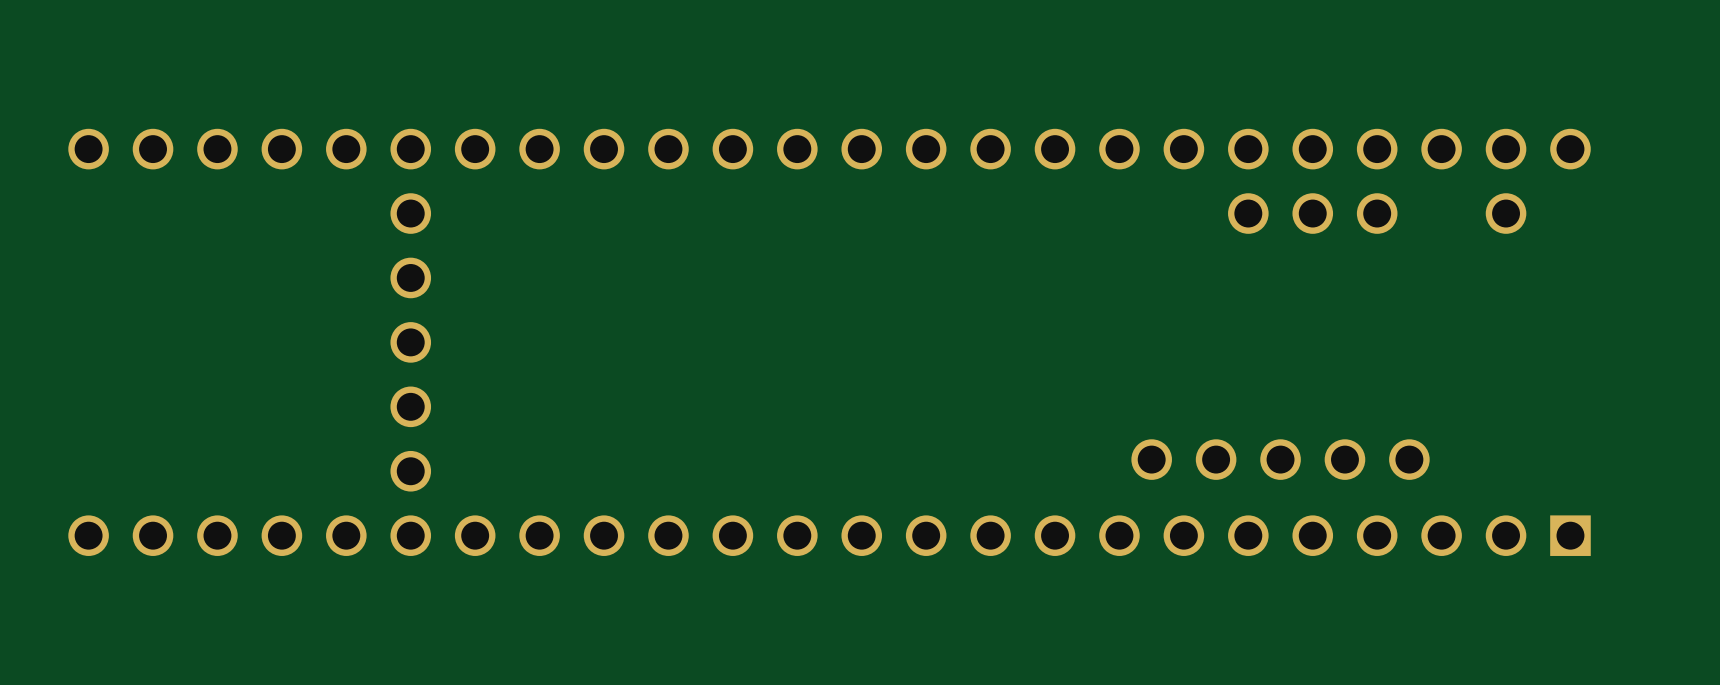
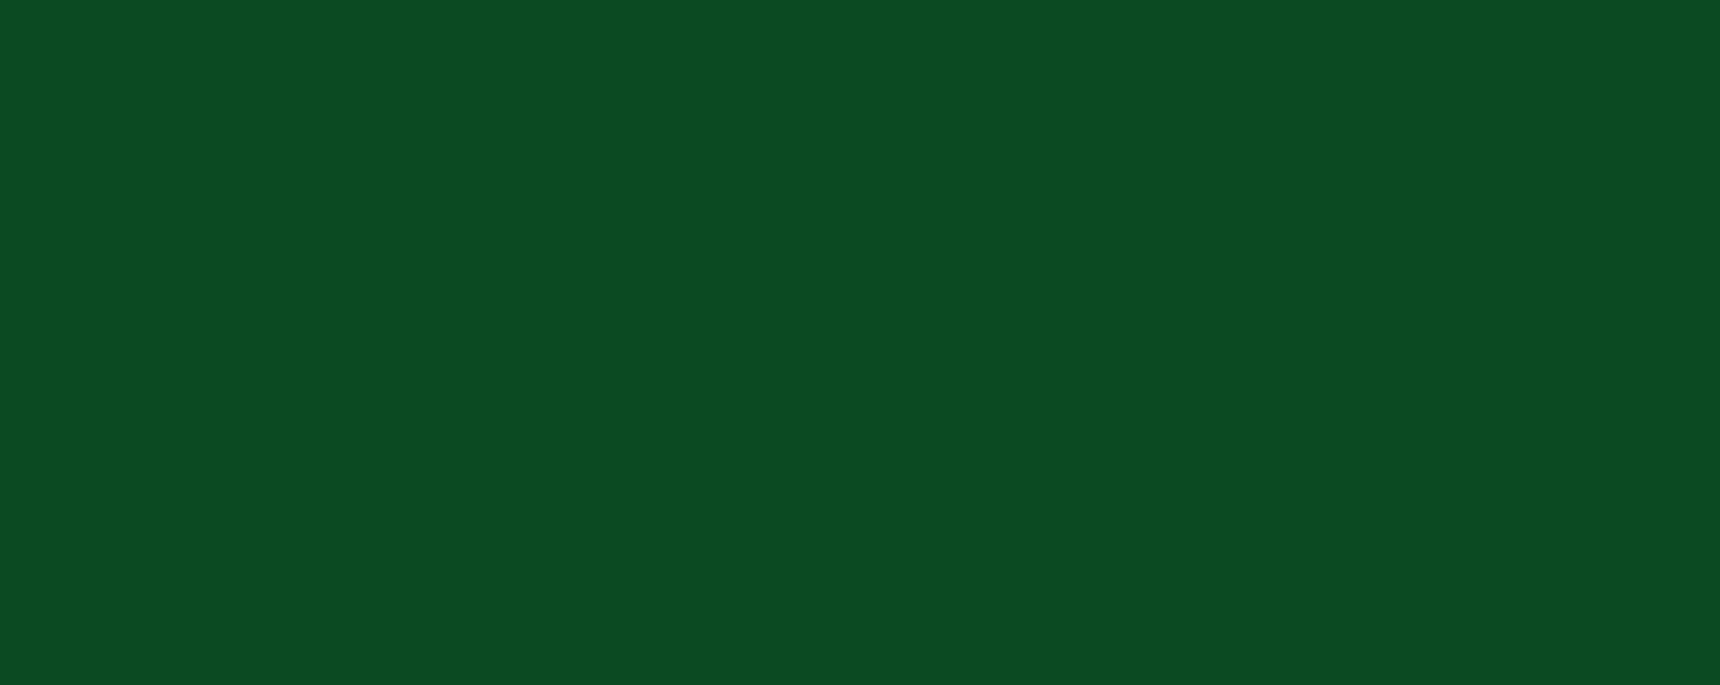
part: (829, 342) -> none

